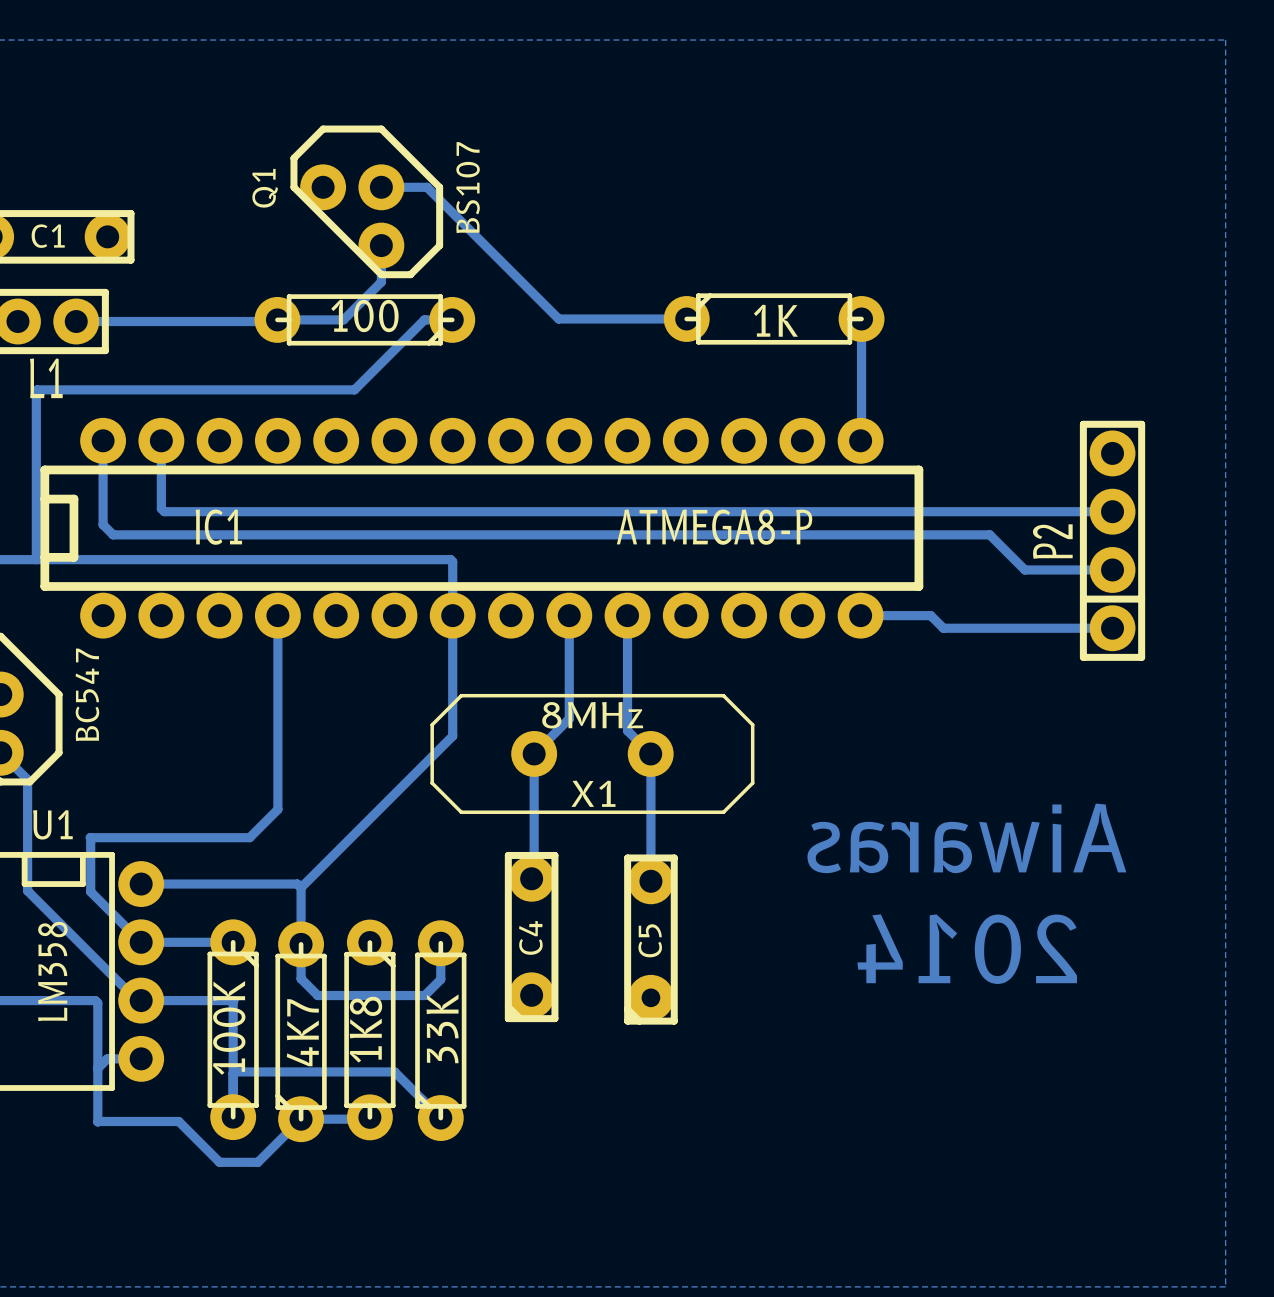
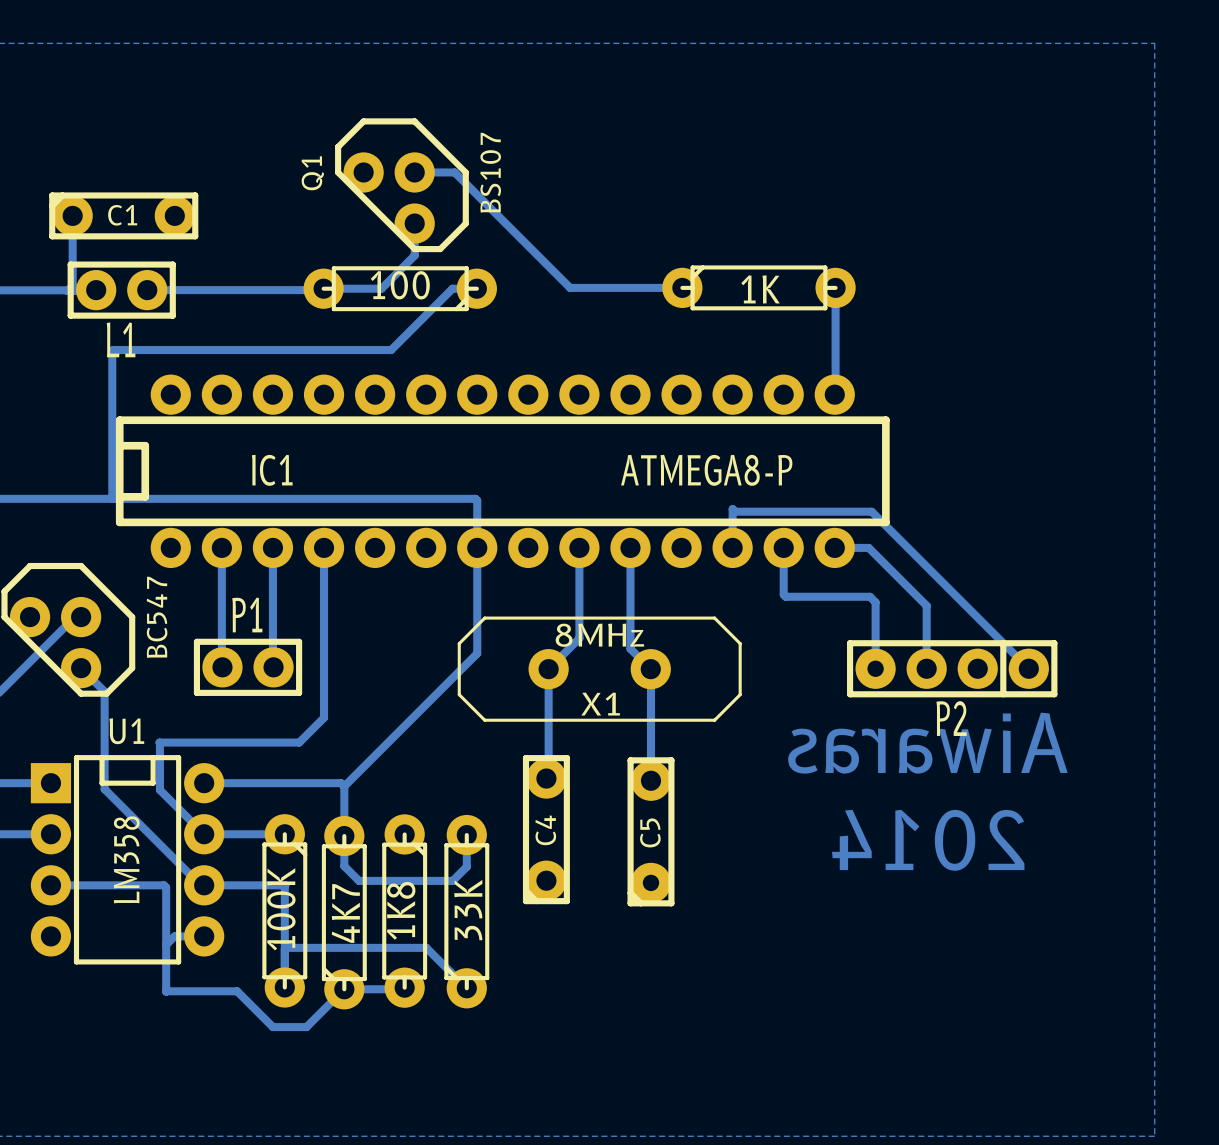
P2 footprint: [1079, 420, 1146, 661] -> [847, 640, 1058, 698]
bottom track: (103, 440) (103, 524) (113, 534) (989, 534) (1024, 569) (1112, 569) -> none
bottom track: (161, 440) (161, 508) (164, 511) (1112, 511) -> none
P2 name position: P2 (1052, 541) -> P2 (951, 718)
bottom track: none -> (221, 547) (222, 667)
bottom track: none -> (272, 547) (273, 667)
bottom track: none -> (732, 547) (732, 509) (735, 511) (871, 511) (1028, 668)
bottom track: none -> (783, 547) (783, 594) (785, 596) (869, 596) (875, 602) (875, 668)
bottom track: (899, 615) (930, 615) (943, 628) (1112, 628) -> (868, 547) (926, 605) (926, 668)
P1: none -> (248, 667)

